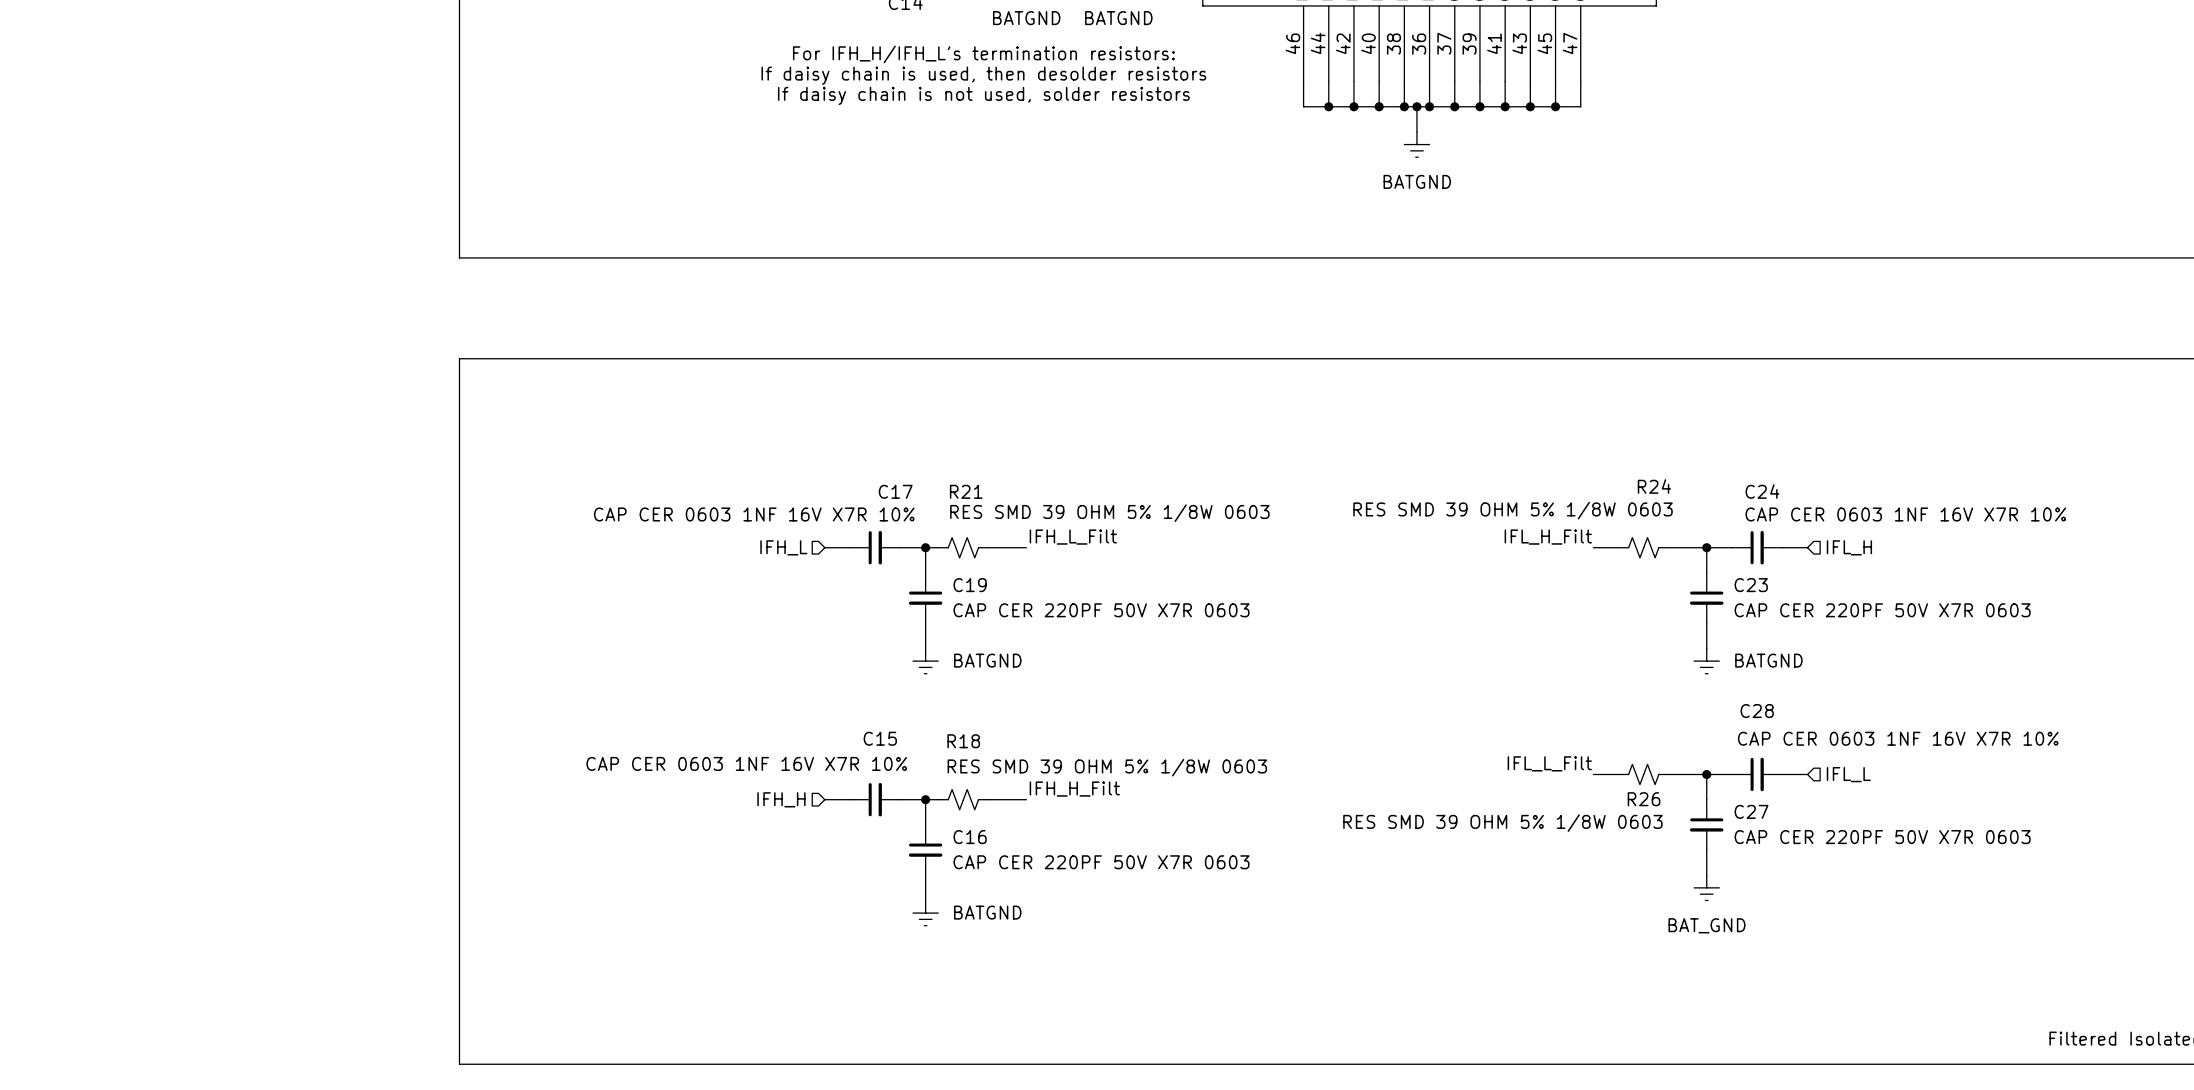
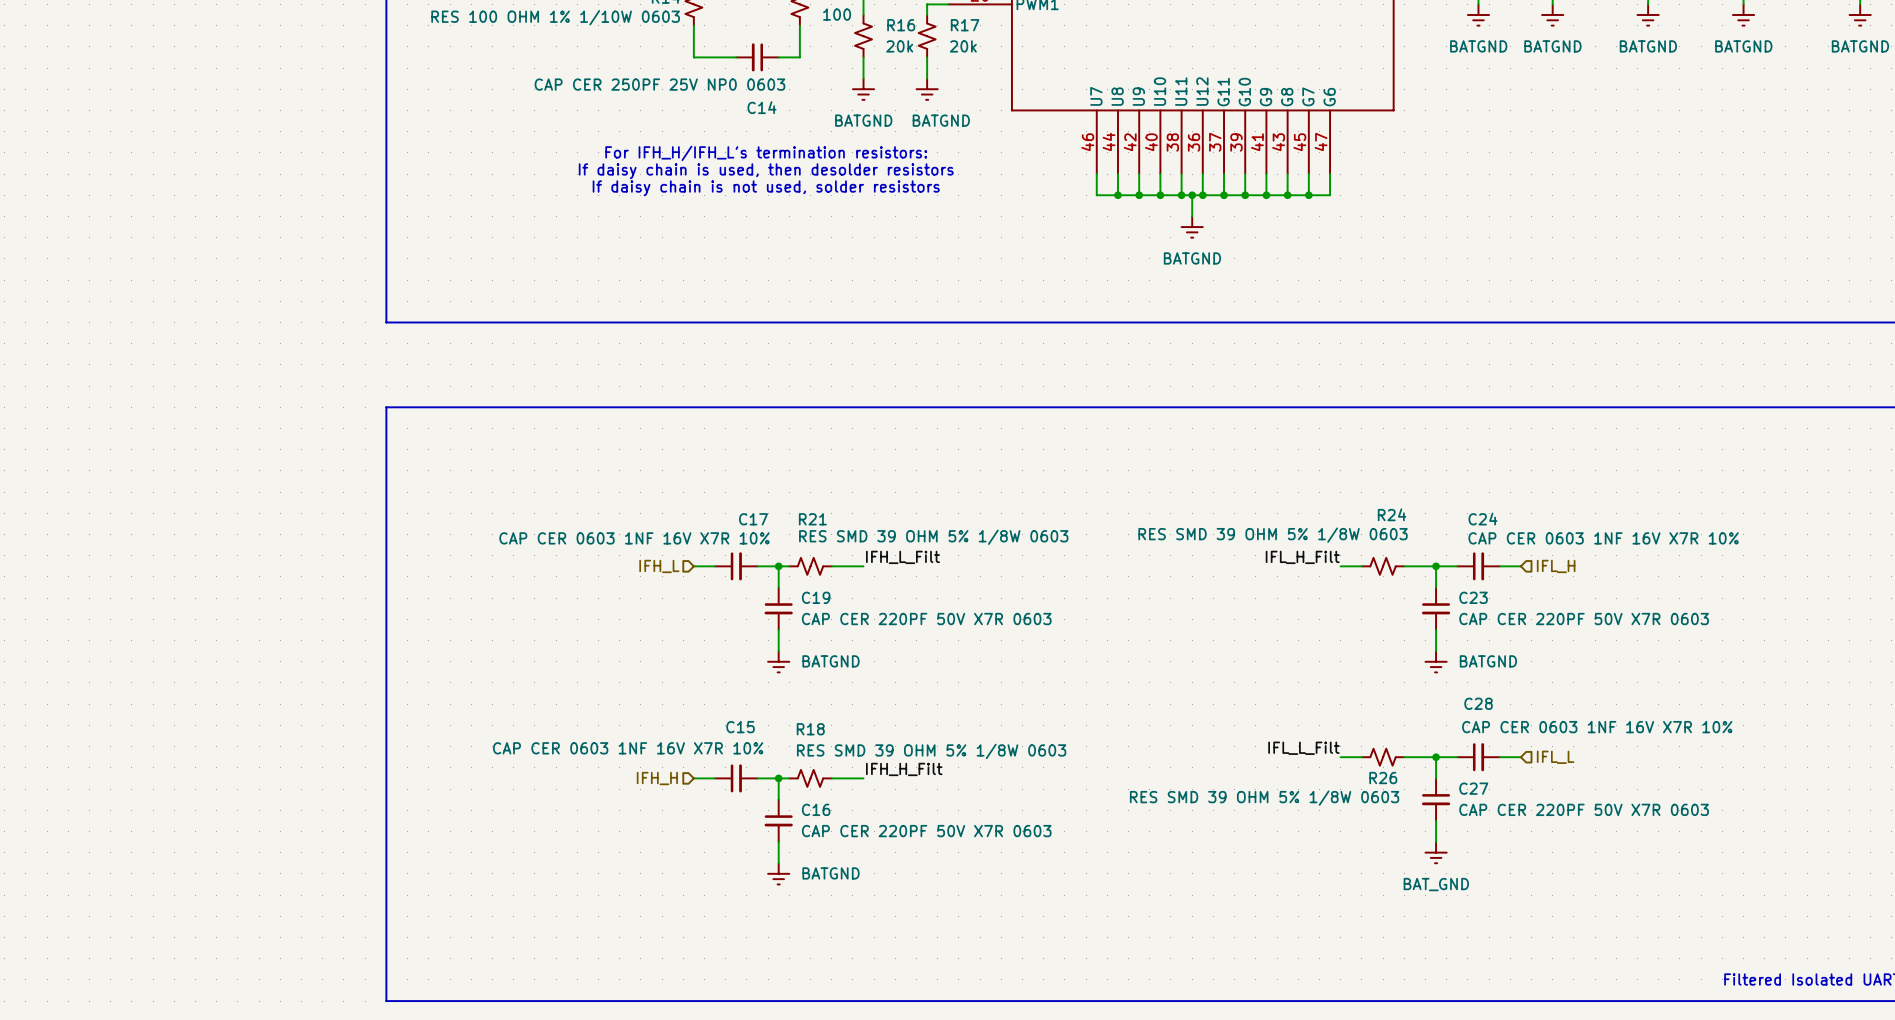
text position: For IFH_H/IFH_L's termination resistors: (983, 54) -> For IFH_H/IFH_L's termination resistors: (766, 153)
text position: If daisy chain is used, then desolder resistors (983, 75) -> If daisy chain is used, then desolder resistors (766, 171)
text position: If daisy chain is not used, solder resistors (983, 95) -> If daisy chain is not used, solder resistors (766, 188)

